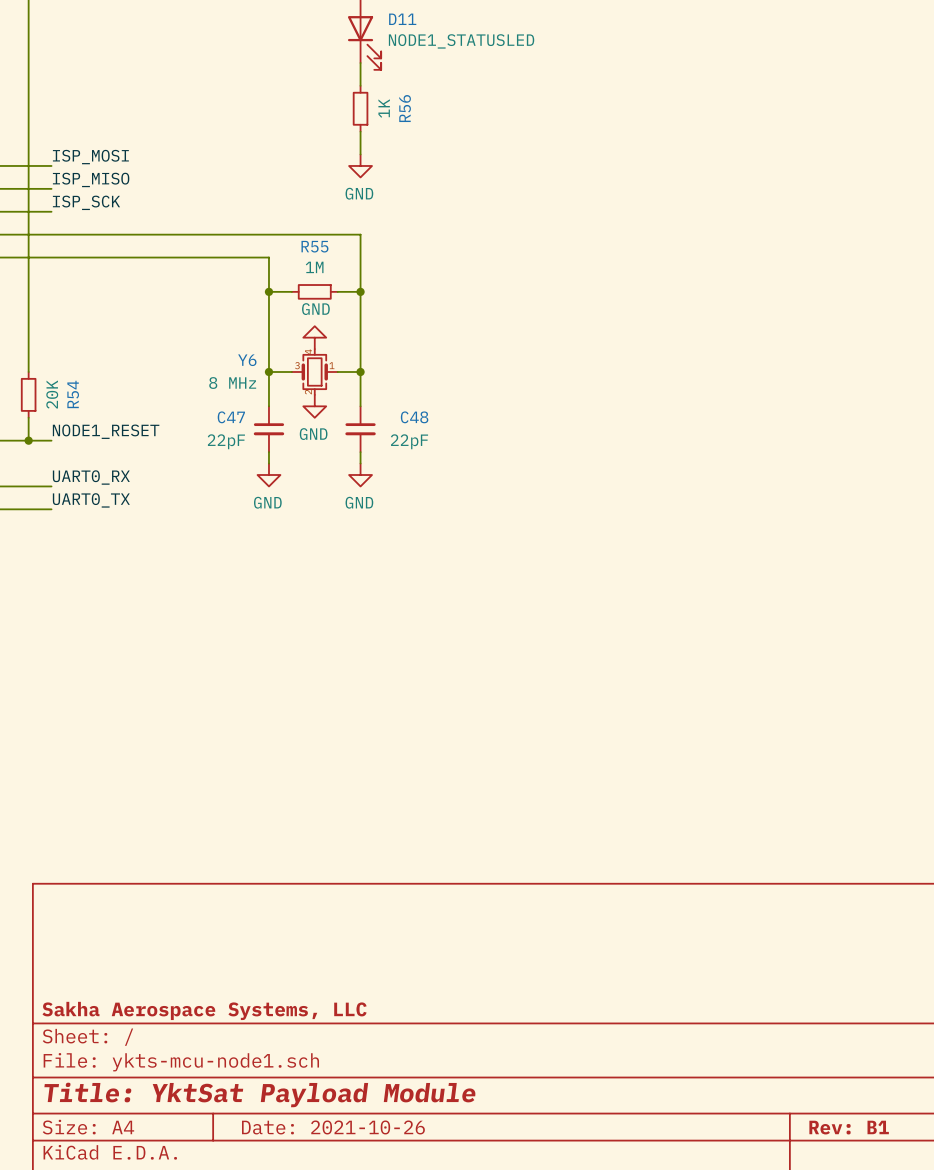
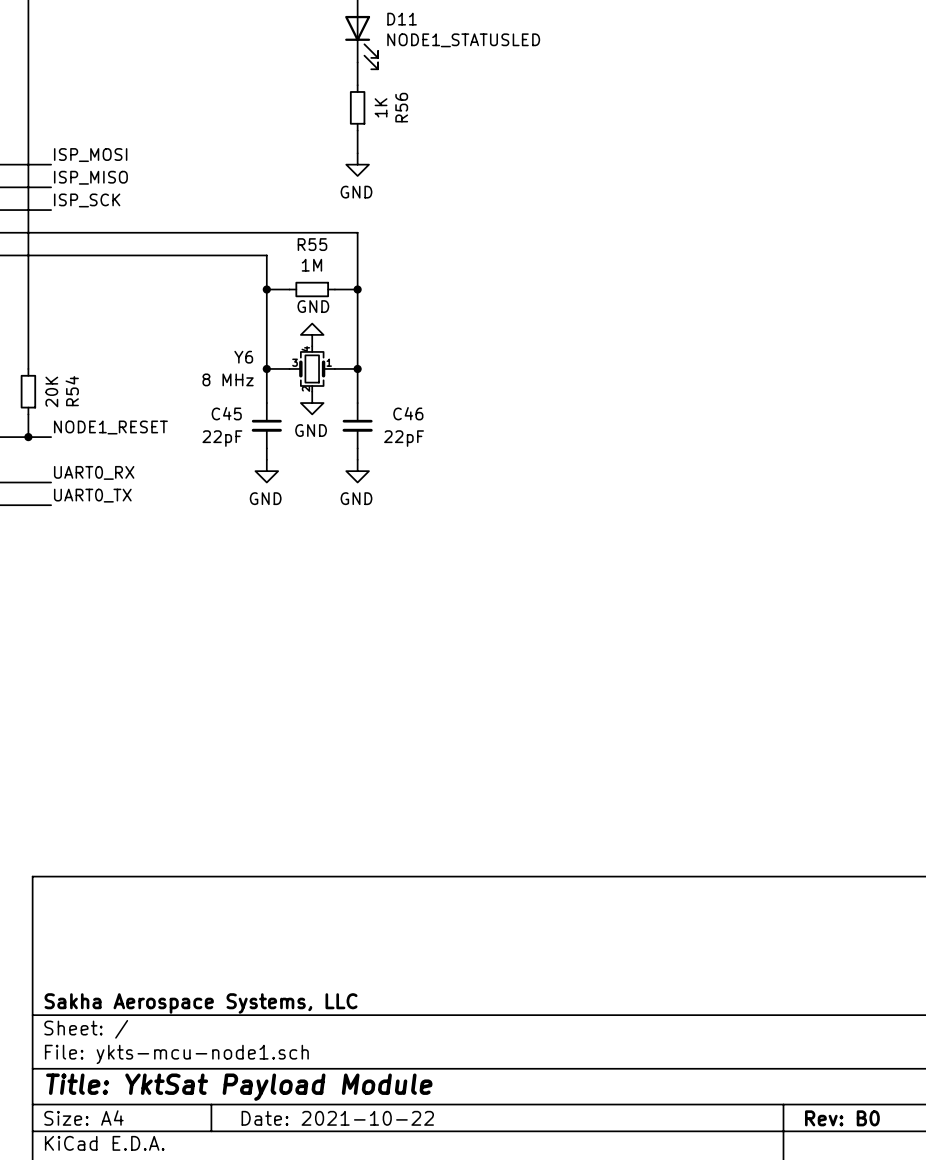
C47 name: C47 (231, 417) -> C45 (226, 413)
C48 name: C48 (414, 417) -> C46 (408, 413)
title block: Date: 2021-10-26 (333, 1127) -> Date: 2021-10-22 (337, 1118)
title block: Rev: B1 (849, 1127) -> Rev: B0 (842, 1118)

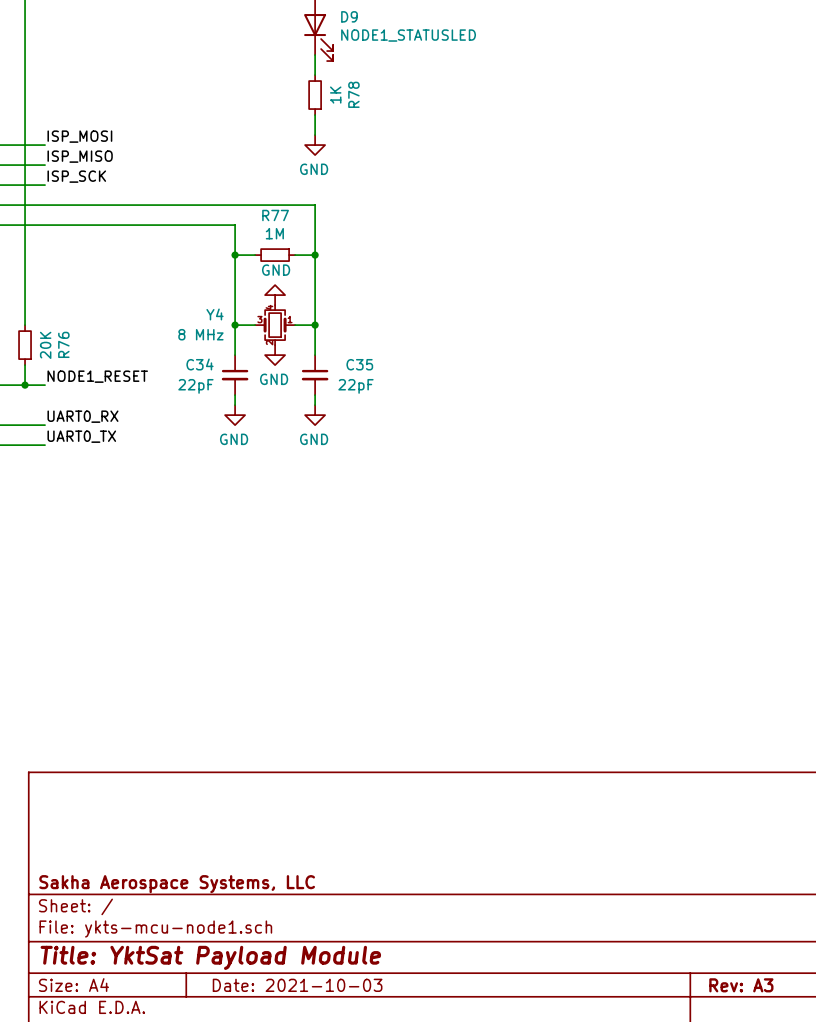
D11 name: D11 (402, 19) -> D9 (349, 16)
R56 name: R56 (401, 107) -> R78 (353, 94)
R55 name: R55 (312, 244) -> R77 (275, 215)
Y6 name: Y6 (243, 357) -> Y4 (215, 314)
R54 name: R54 (72, 391) -> R76 (63, 344)
C45 name: C45 (226, 413) -> C34 (199, 364)
C46 name: C46 (408, 413) -> C35 (359, 364)
title block: Date: 2021-10-22 (337, 1118) -> Date: 2021-10-03 (297, 985)
title block: Rev: B0 (842, 1118) -> Rev: A3 (741, 985)

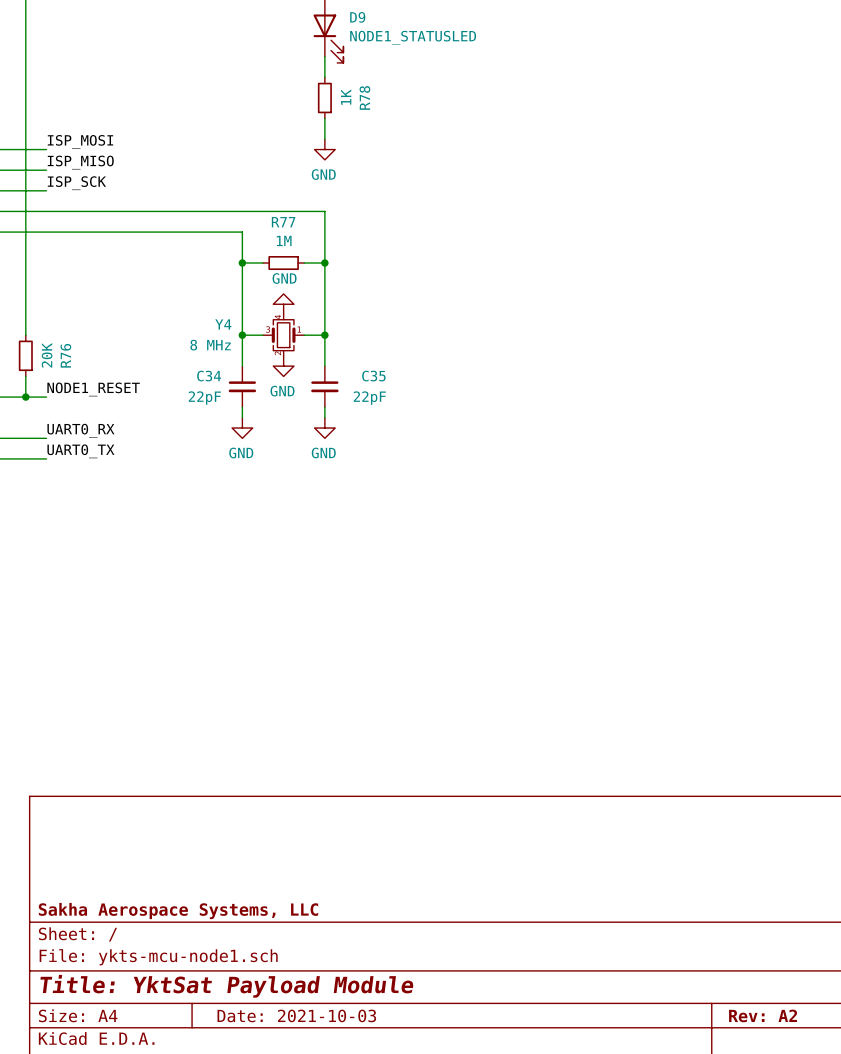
title block: Rev: A3 (741, 985) -> Rev: A2 (763, 1015)

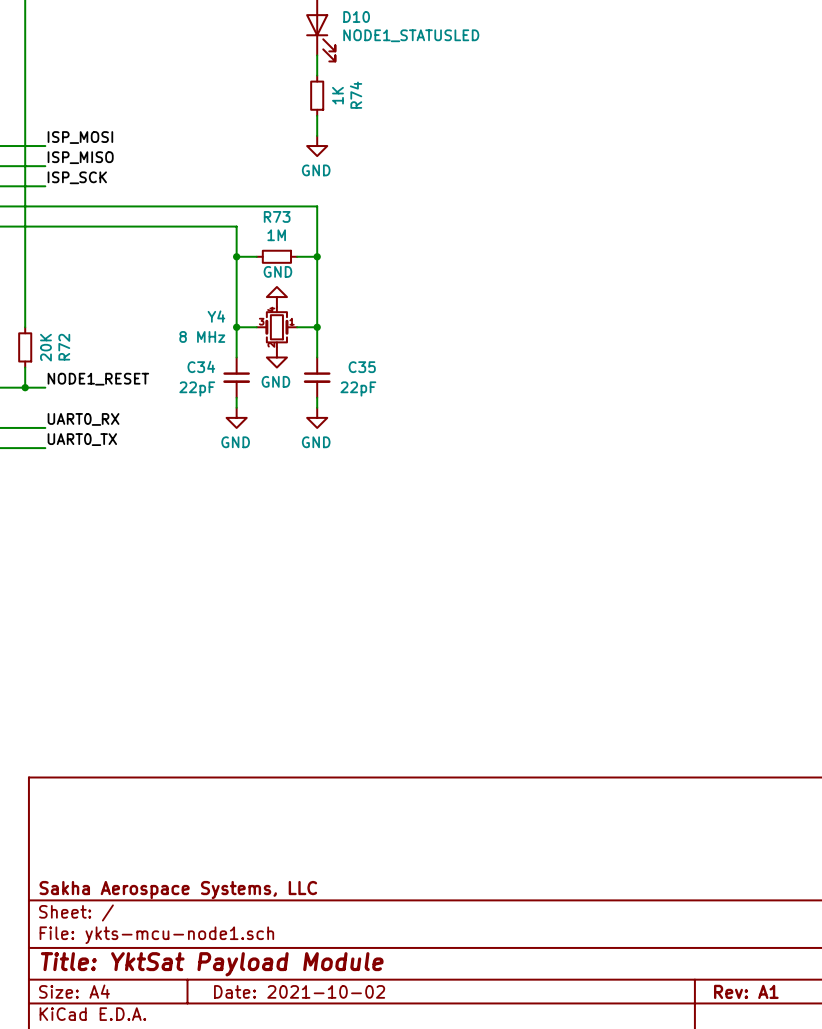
D9 name: D9 (357, 17) -> D10 (356, 16)
R78 name: R78 (364, 97) -> R74 (356, 95)
R77 name: R77 (283, 222) -> R73 (277, 216)
R76 name: R76 (65, 355) -> R72 (64, 347)
title block: Date: 2021-10-03 (296, 1015) -> Date: 2021-10-02 (299, 991)
title block: Rev: A2 (763, 1015) -> Rev: A1 (746, 991)

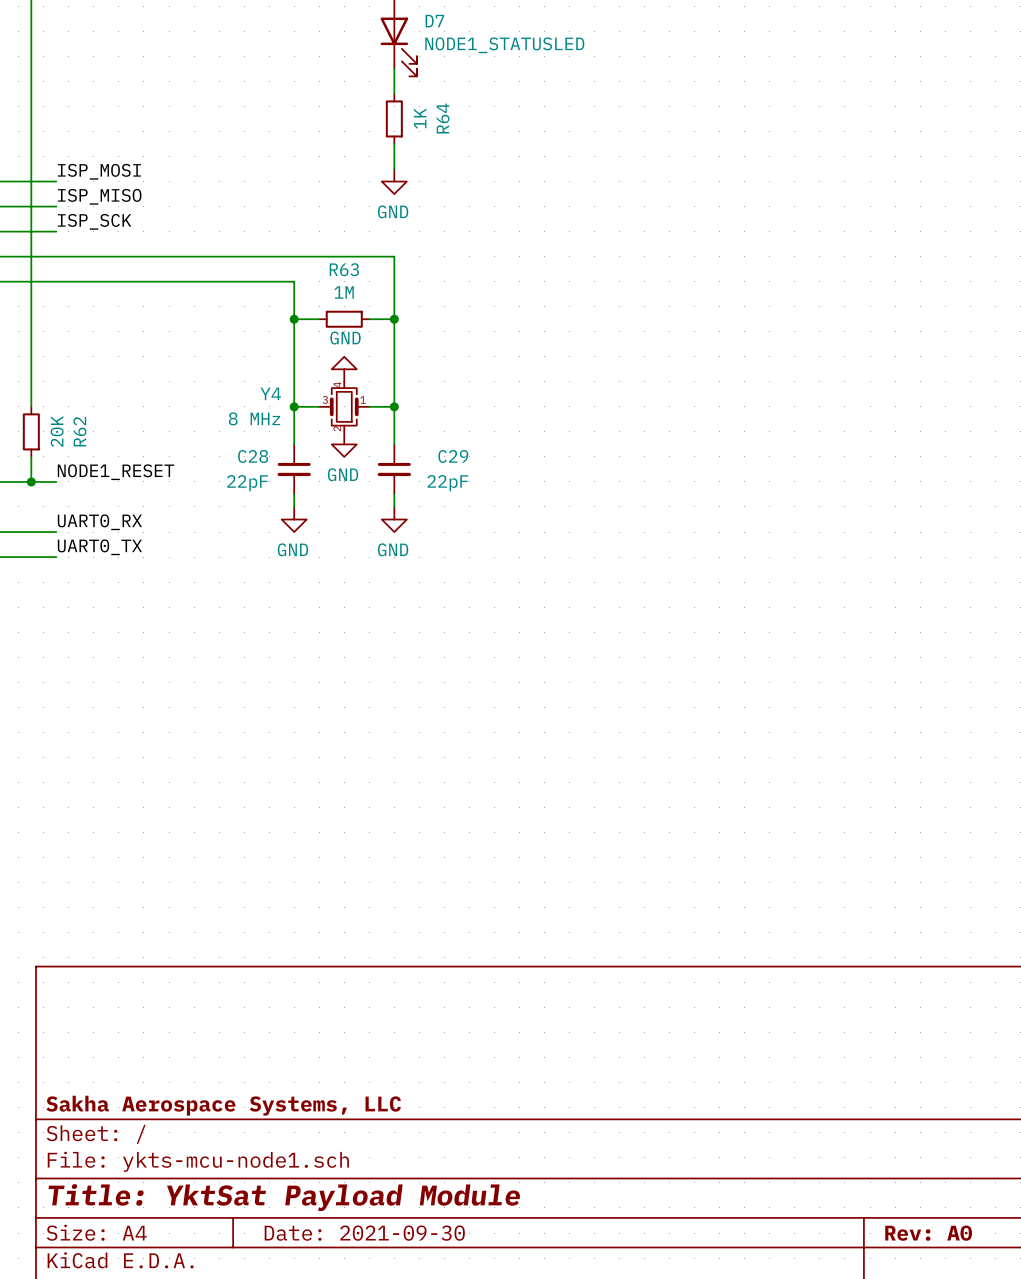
D10 name: D10 (356, 16) -> D7 (434, 21)
R74 name: R74 (356, 95) -> R64 (443, 118)
R73 name: R73 (277, 216) -> R63 (344, 269)
R72 name: R72 (64, 347) -> R62 (79, 431)
C34 name: C34 (201, 366) -> C28 (253, 456)
C35 name: C35 (362, 367) -> C29 (453, 456)
title block: Date: 2021-10-02 (299, 991) -> Date: 2021-09-30 (364, 1233)
title block: Rev: A1 (746, 991) -> Rev: A0 (928, 1233)

